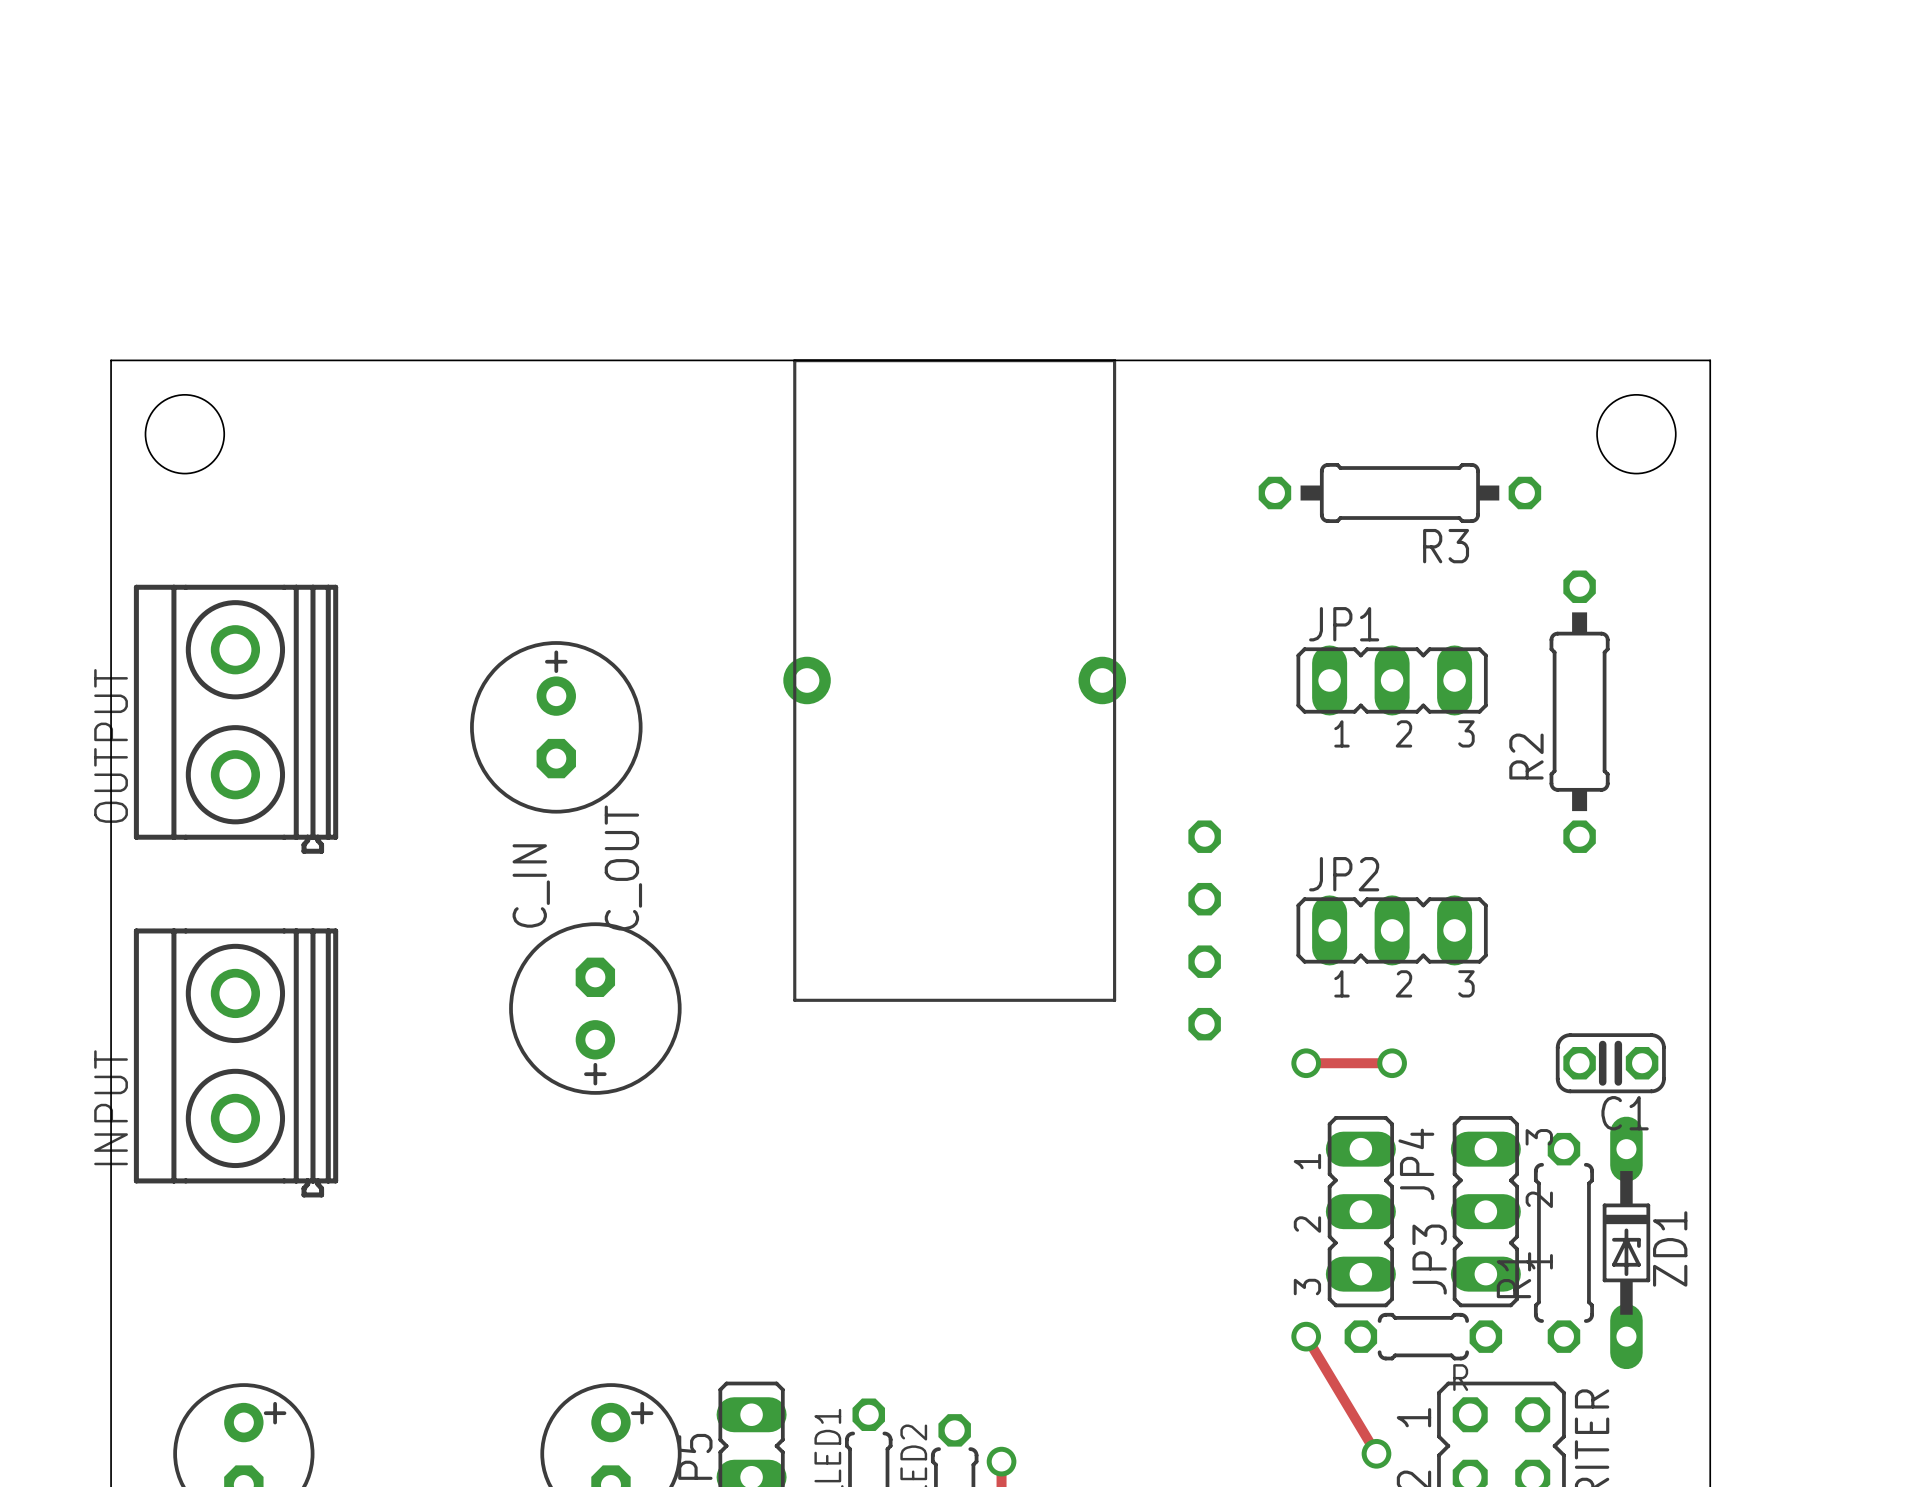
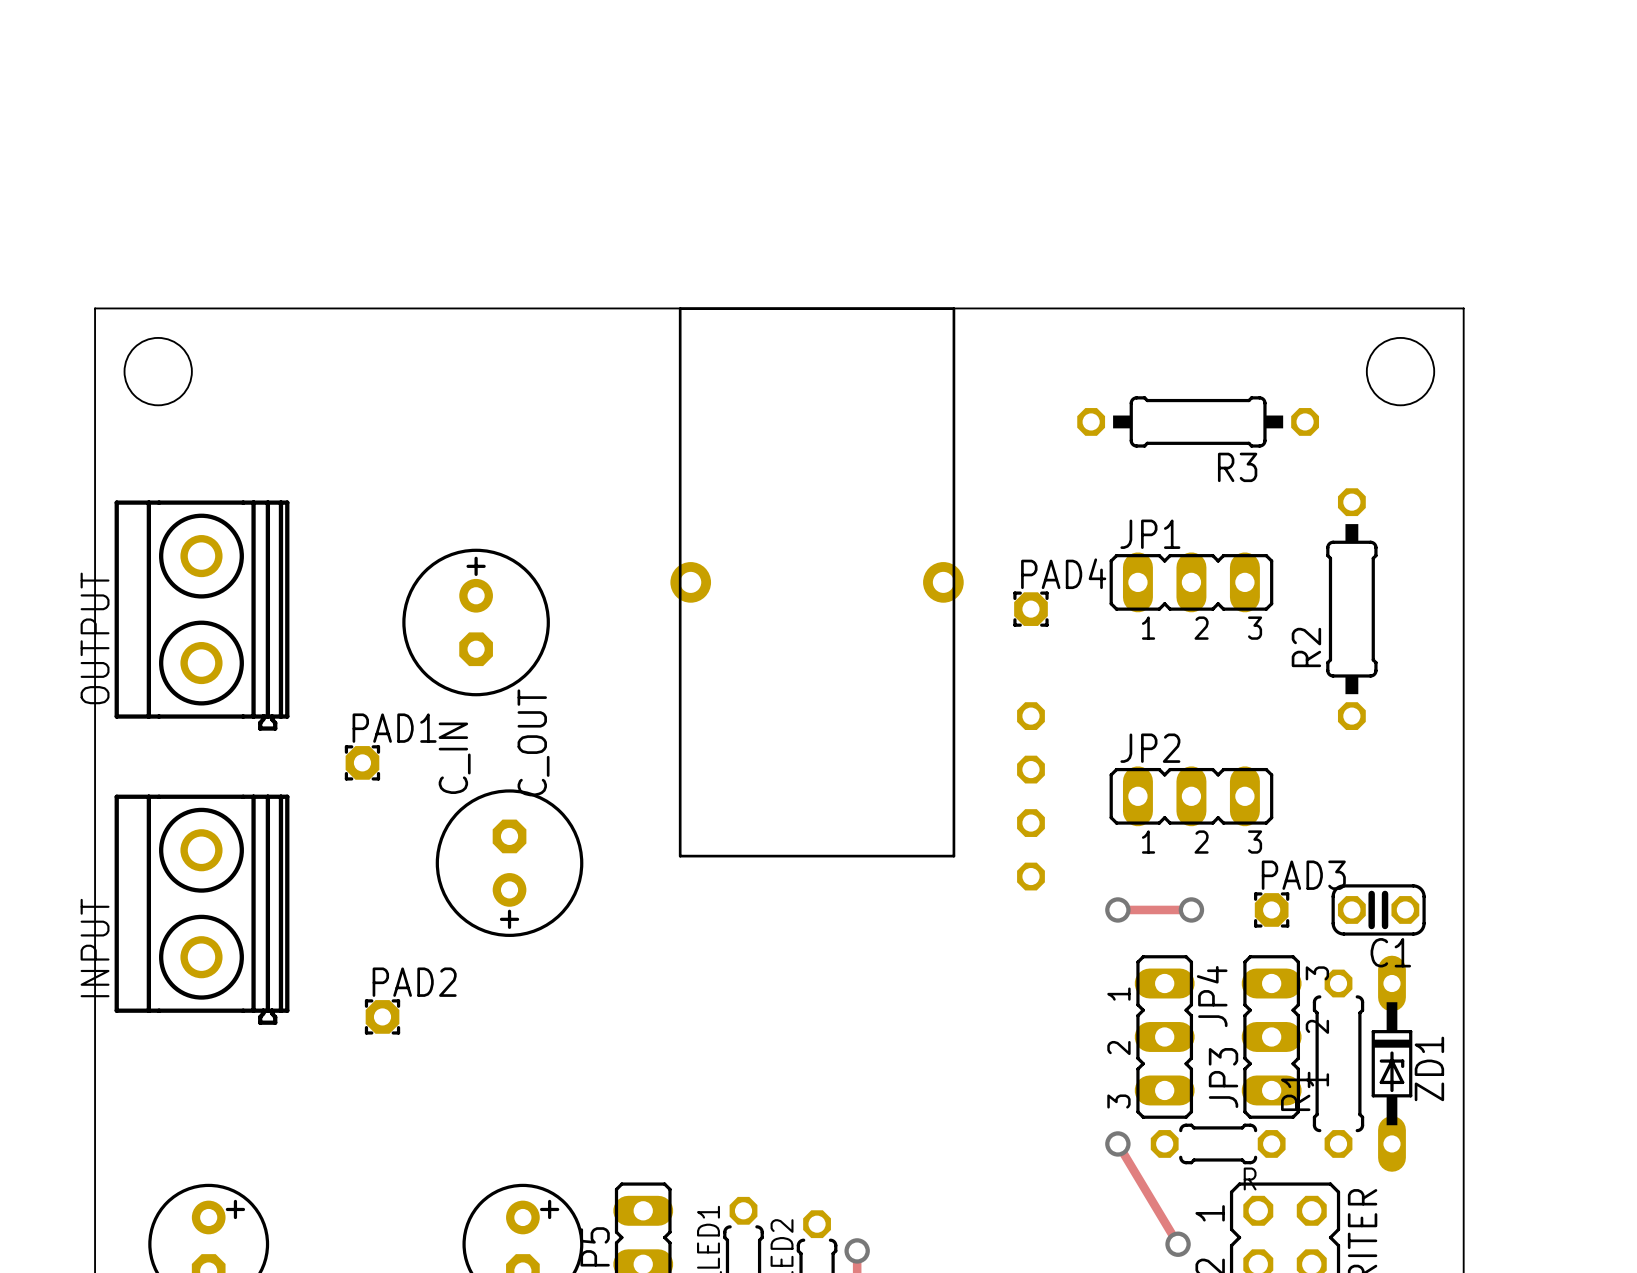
PAD4: none -> (1030, 609)
PAD1: none -> (362, 762)
PAD3: none -> (1271, 909)
PAD2: none -> (382, 1016)

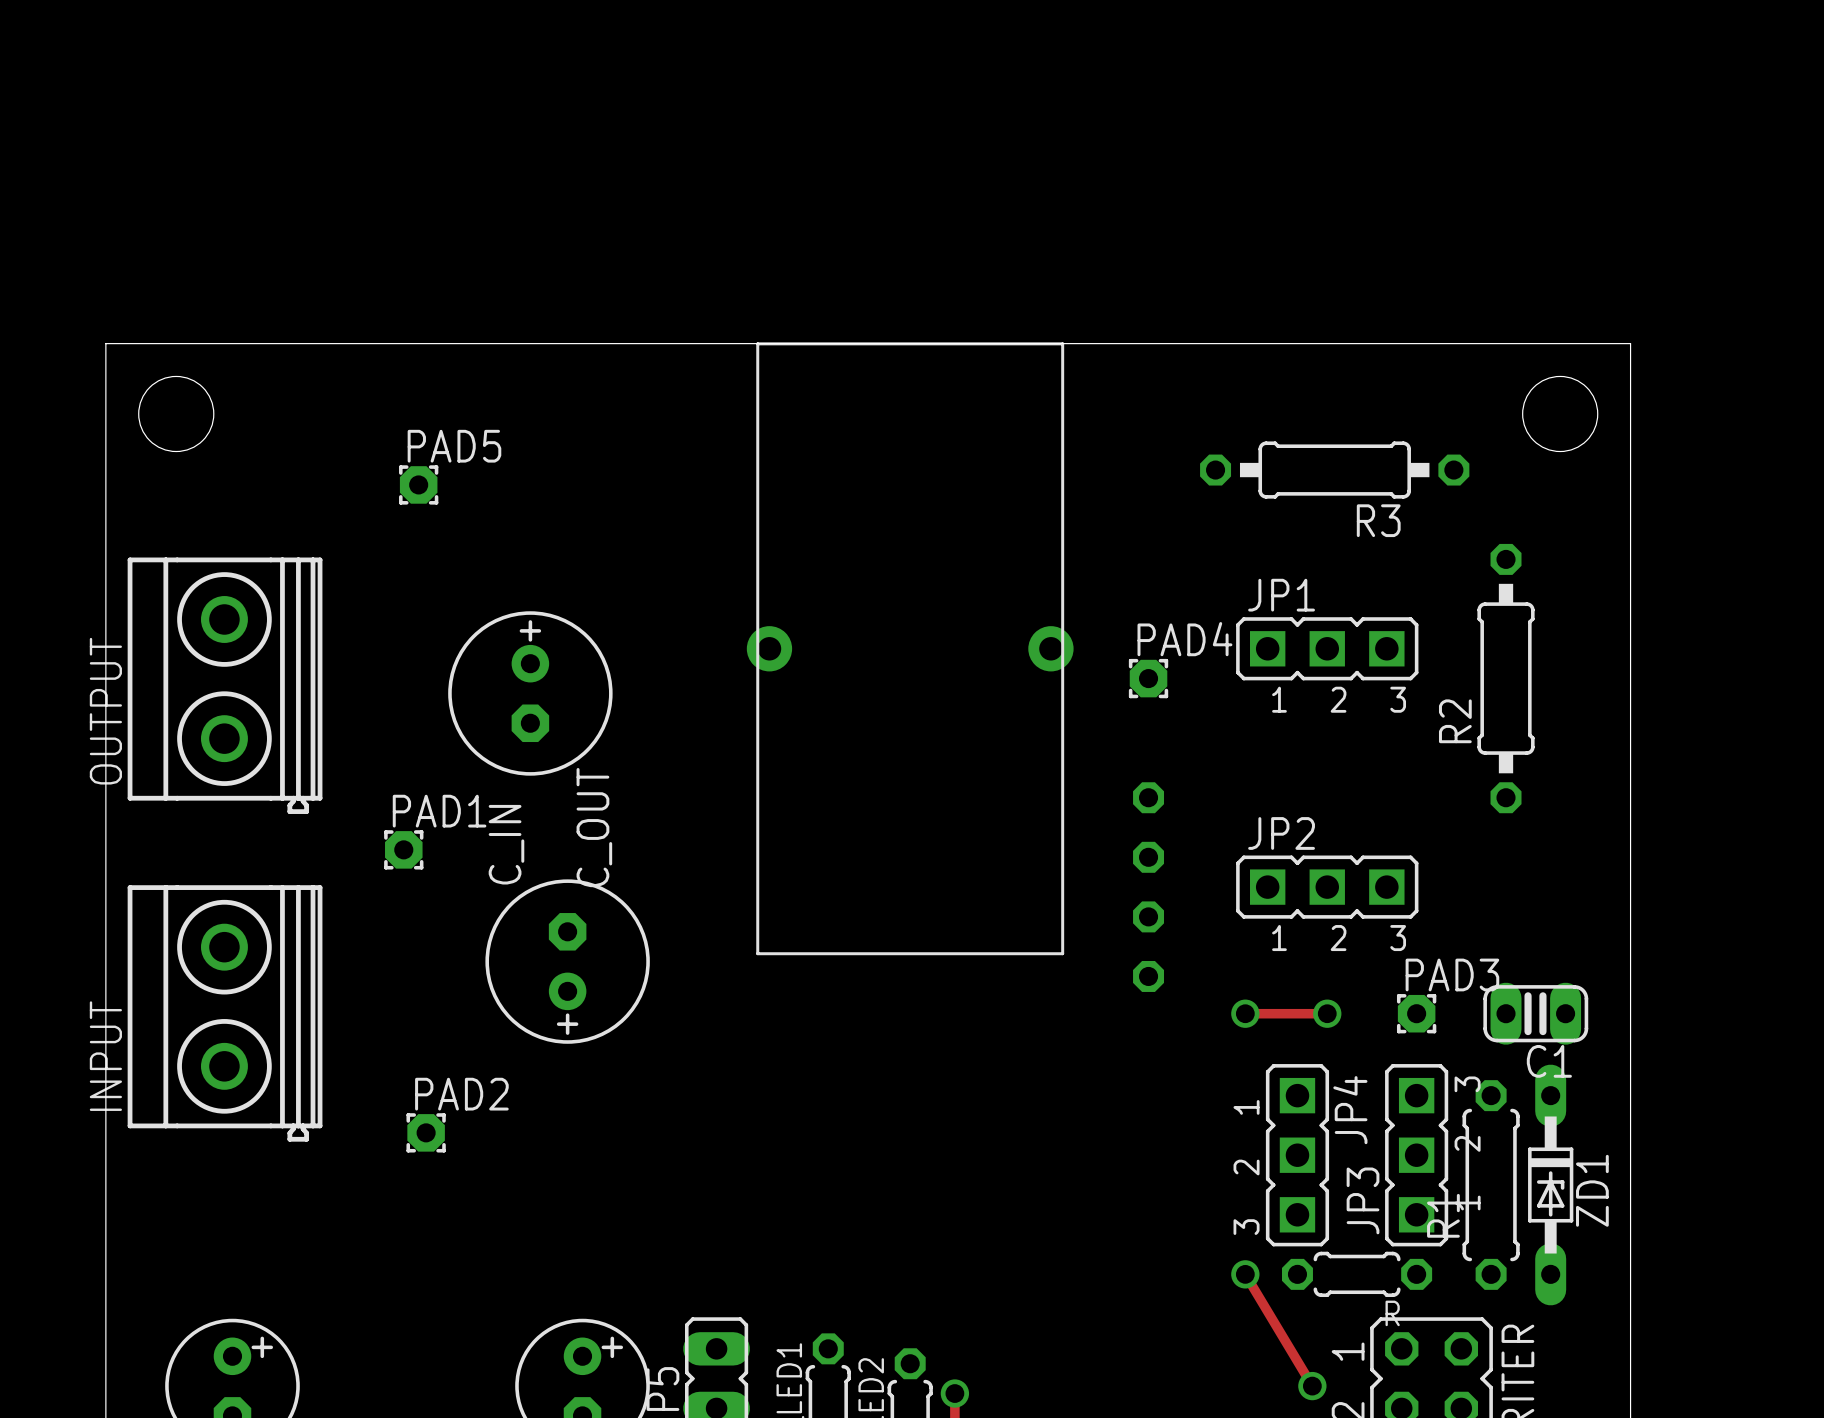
PAD5: none -> (418, 484)
JP1 footprint: [1109, 552, 1274, 613] -> [1236, 617, 1419, 681]
JP2 footprint: [1109, 766, 1274, 827] -> [1236, 855, 1419, 919]
C1 footprint: [1331, 884, 1426, 936] -> [1483, 982, 1589, 1045]
JP4 footprint: [1134, 955, 1195, 1119] -> [1265, 1064, 1330, 1247]
JP3 footprint: [1241, 955, 1302, 1119] -> [1385, 1064, 1449, 1247]

